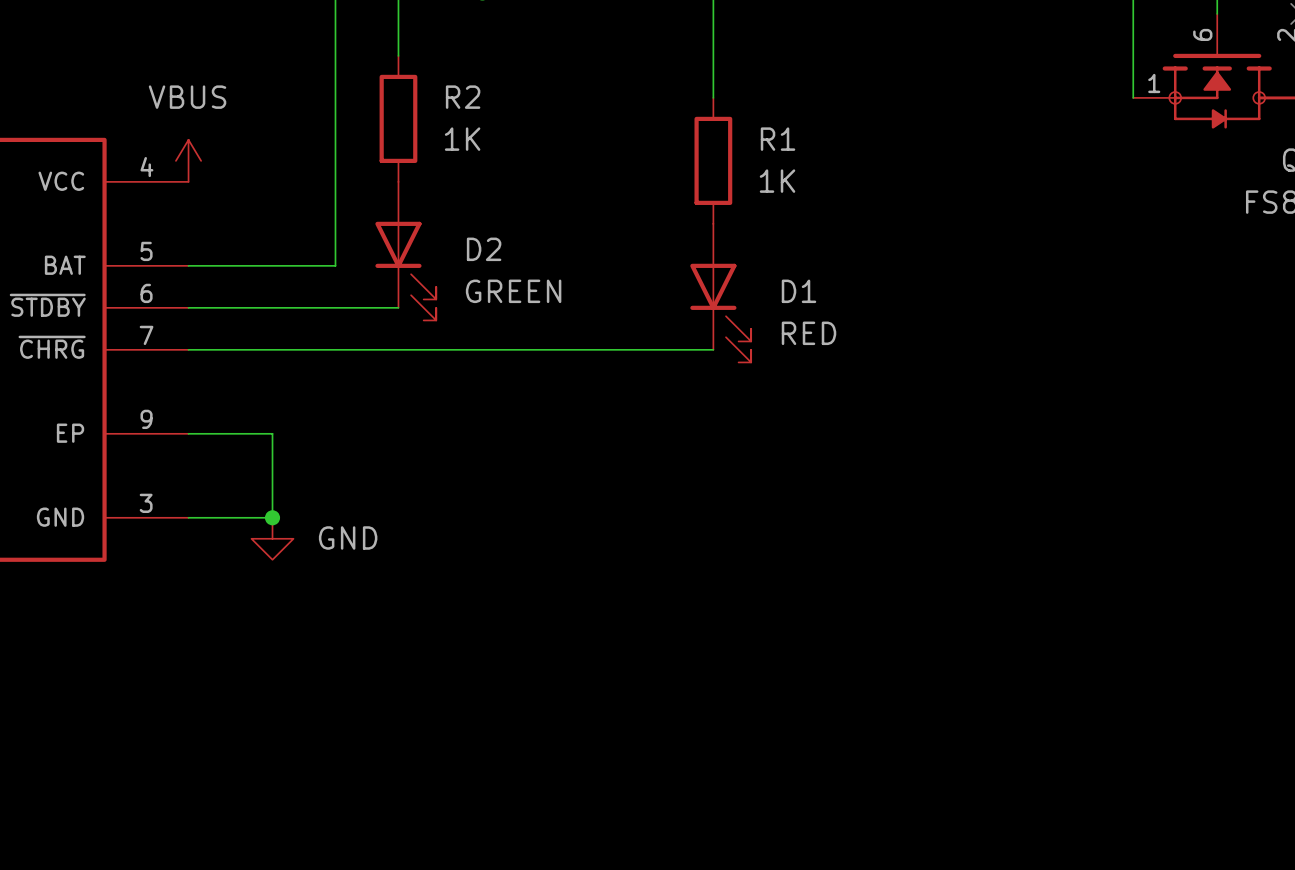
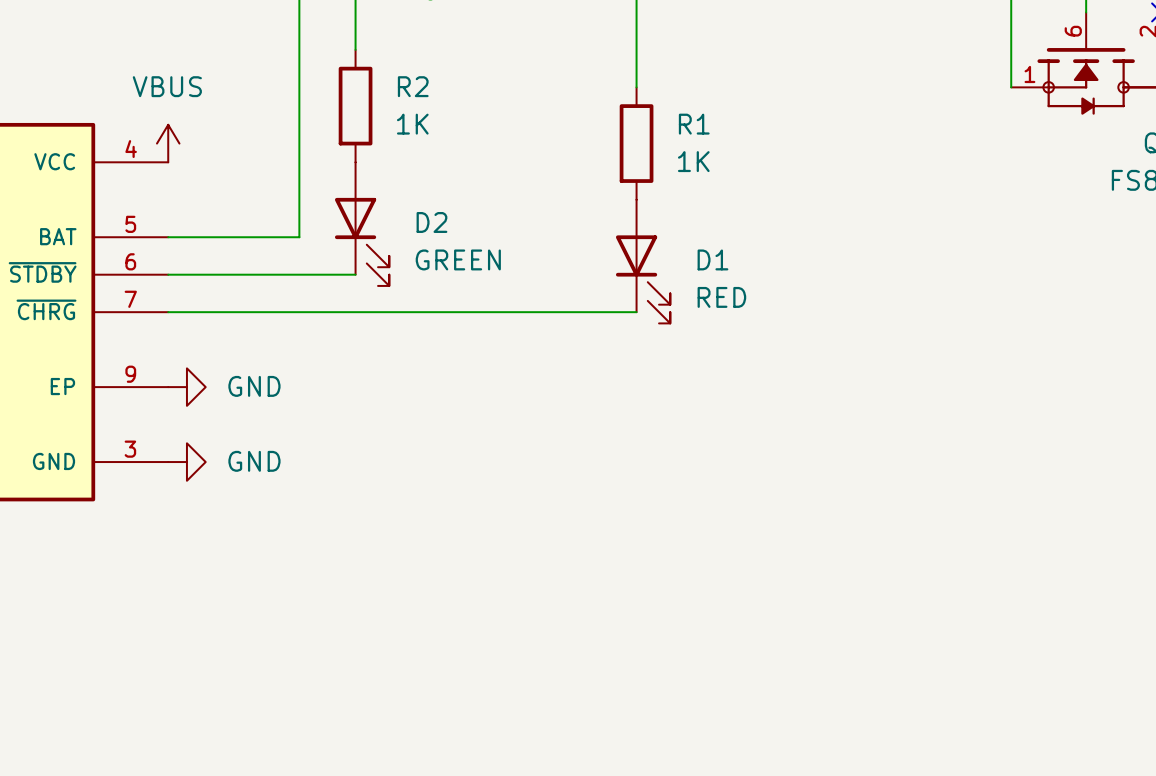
wire: (188, 433) (272, 433) (272, 517) (188, 517) -> none
power symbol: none -> GND (186, 387)
power symbol: none -> GND (186, 462)
junction: (272, 517) -> none
power symbol: GND (272, 538) -> none

